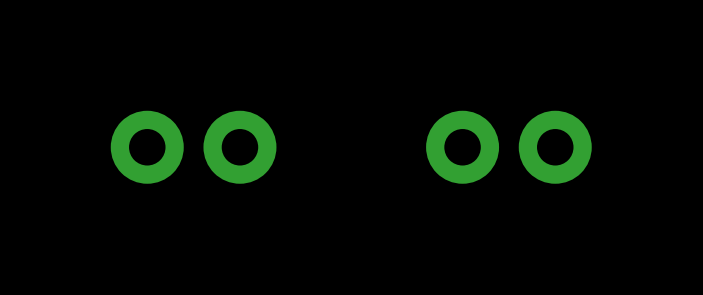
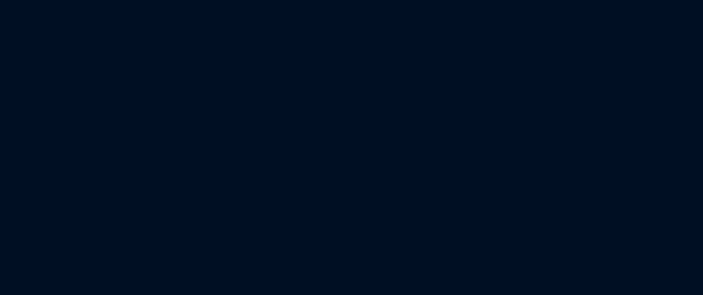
part: (193, 147) -> none
part: (508, 147) -> none

